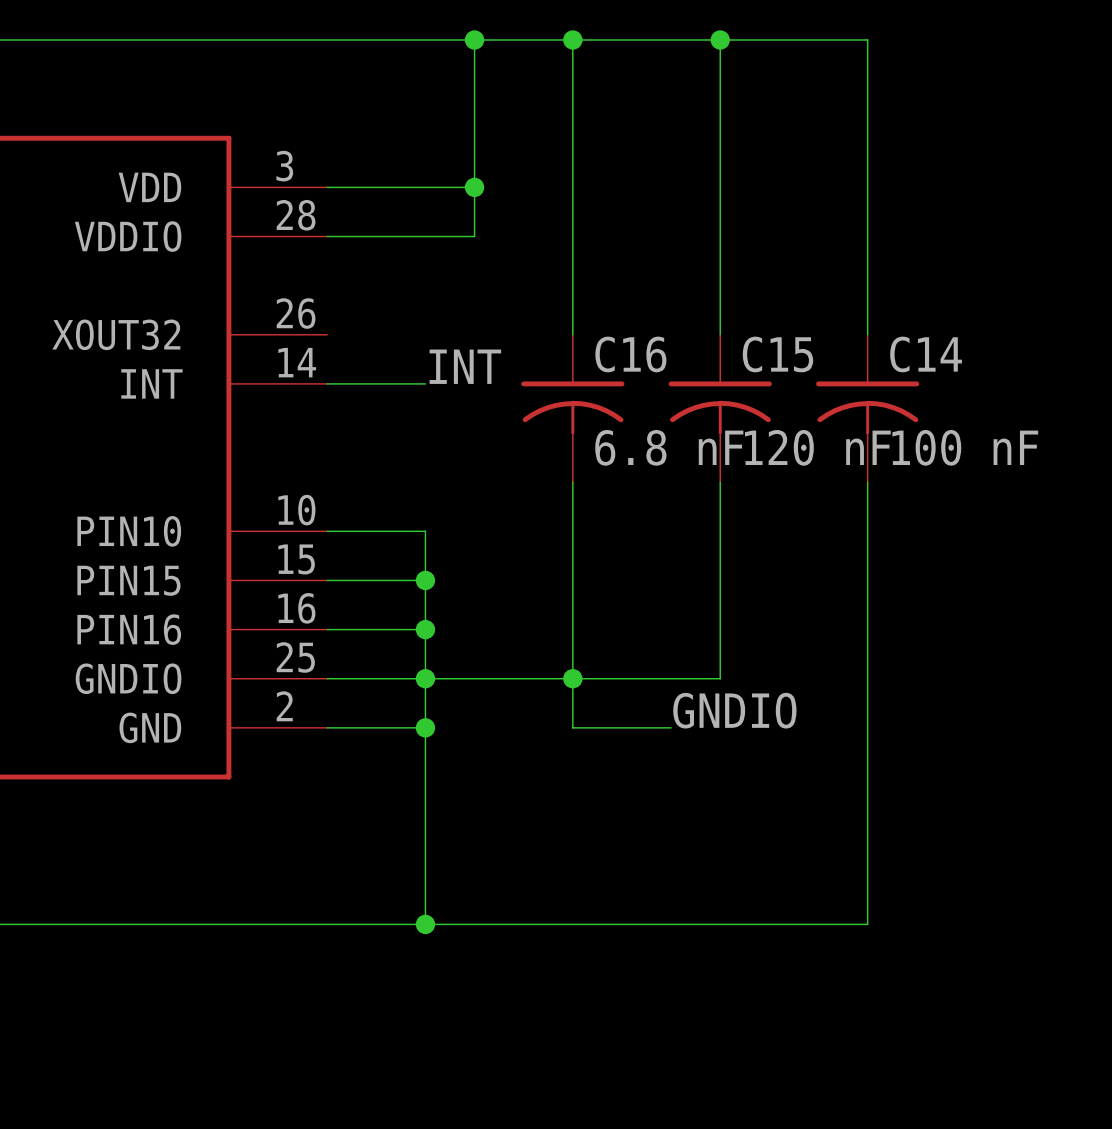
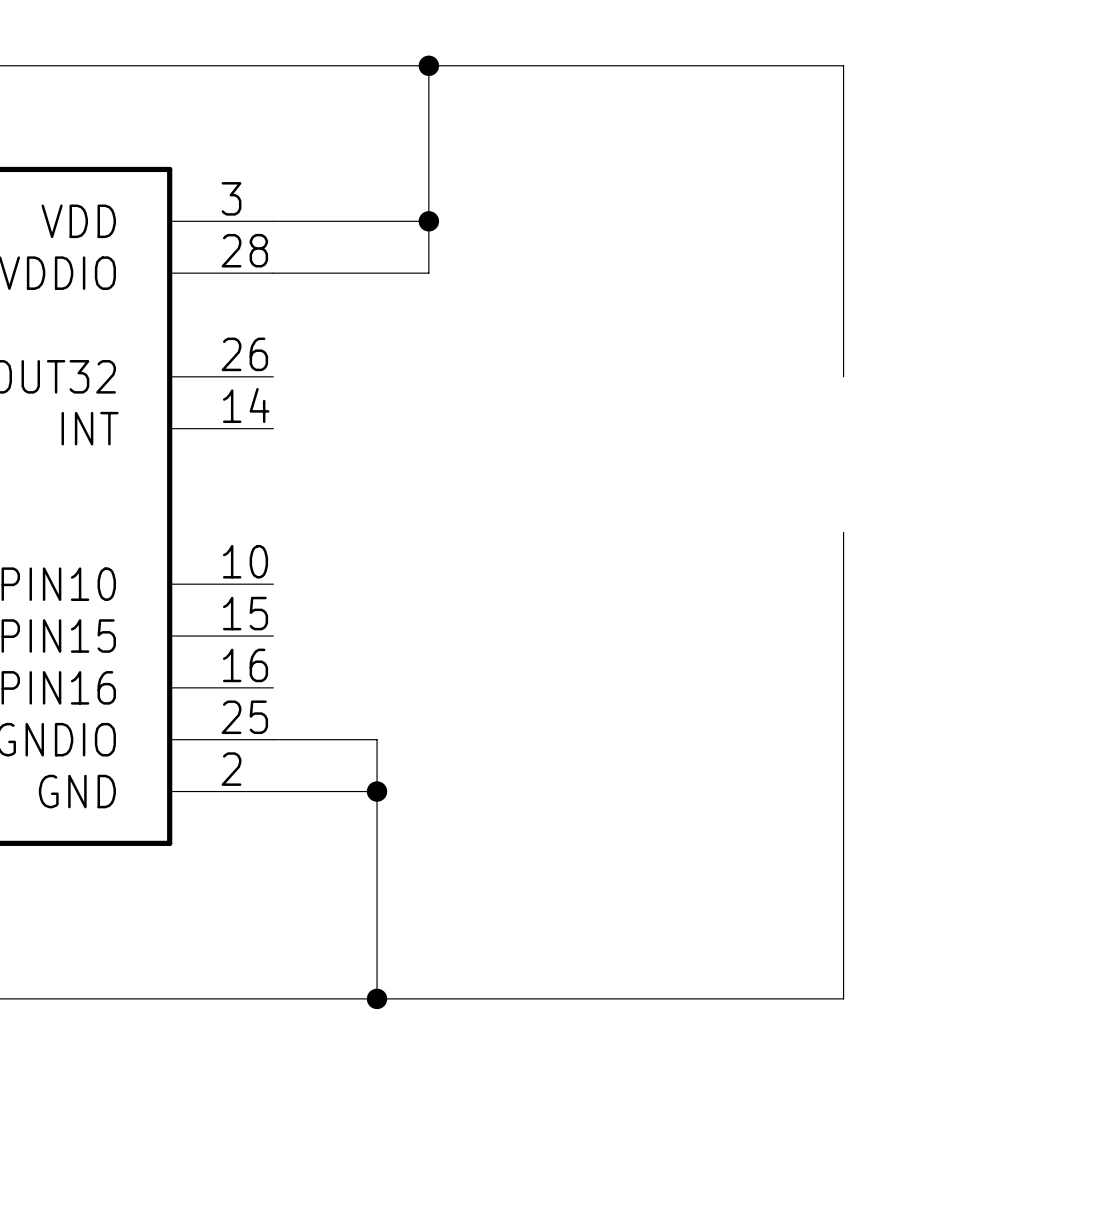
wire: (572, 39) (572, 334) -> none
junction: (572, 39) -> none
wire: (720, 39) (720, 334) -> none
junction: (720, 39) -> none
label: INT (465, 366) -> none
wire: (327, 383) (425, 383) -> none
C16: 6.8 nF (572, 408) -> none
C15: 120 nF (720, 408) -> none
C14: 100 nF (867, 408) -> none
wire: (572, 482) (572, 727) (671, 727) -> none
wire: (720, 482) (720, 678) (425, 678) (425, 531) (327, 531) -> none
wire: (327, 580) (425, 580) -> none
junction: (425, 580) -> none
wire: (327, 629) (425, 629) -> none
junction: (425, 629) -> none
junction: (425, 678) -> none
junction: (572, 678) -> none
label: GNDIO (734, 710) -> none

